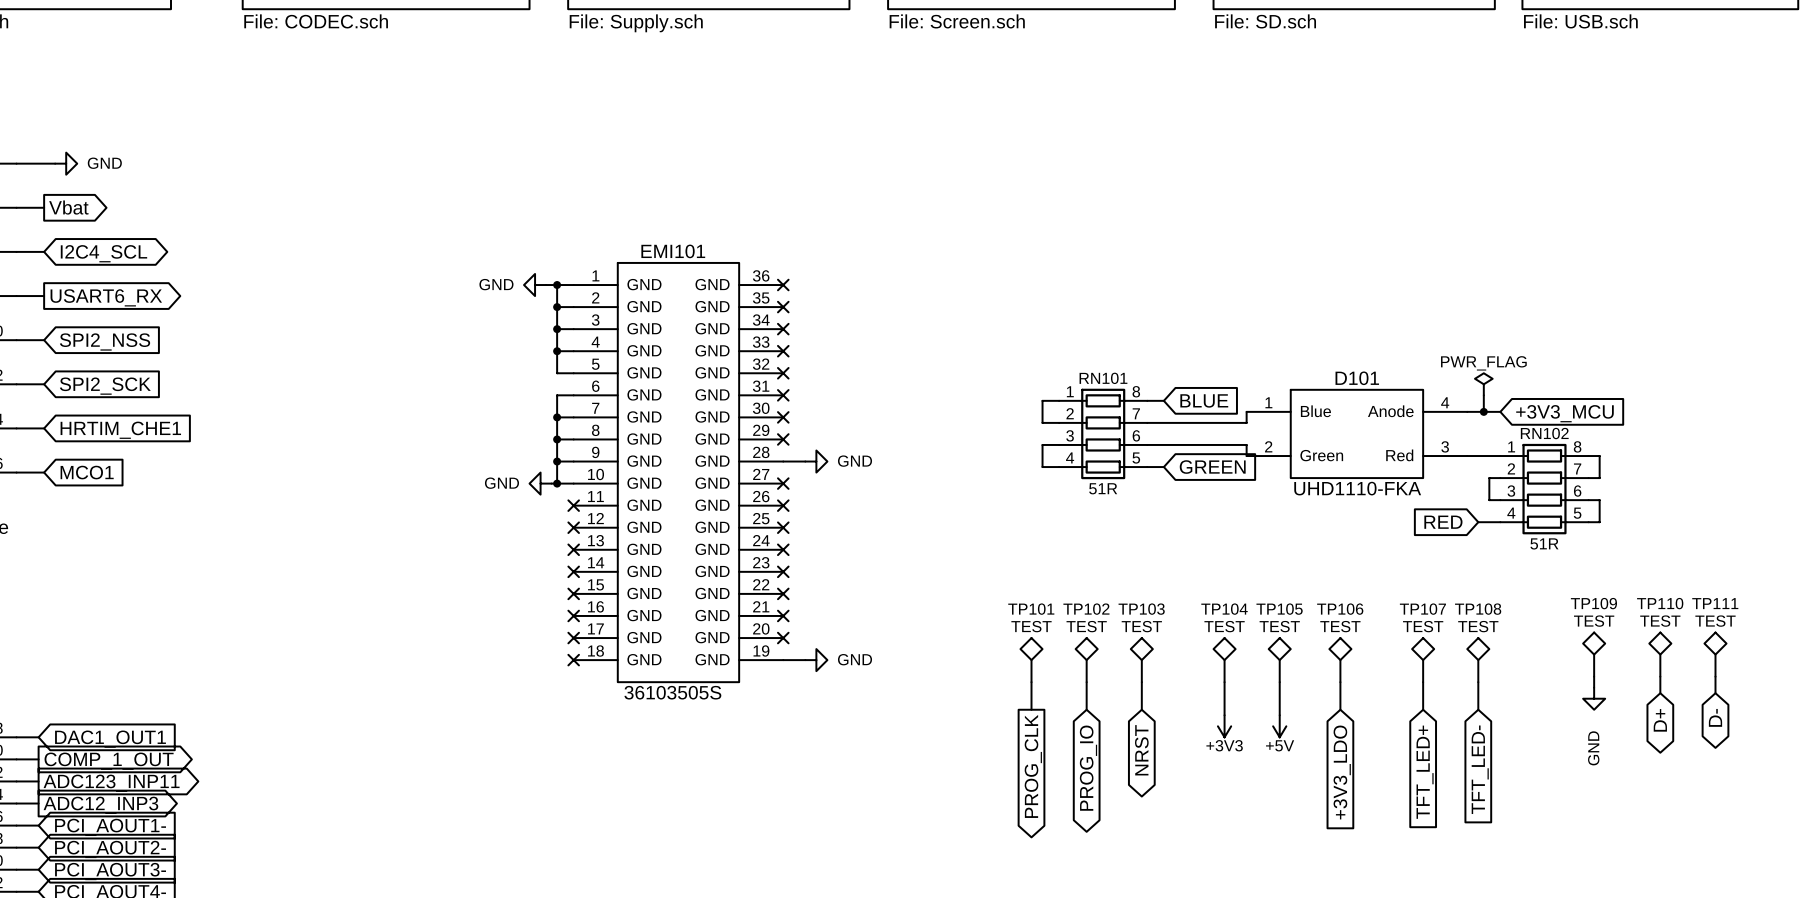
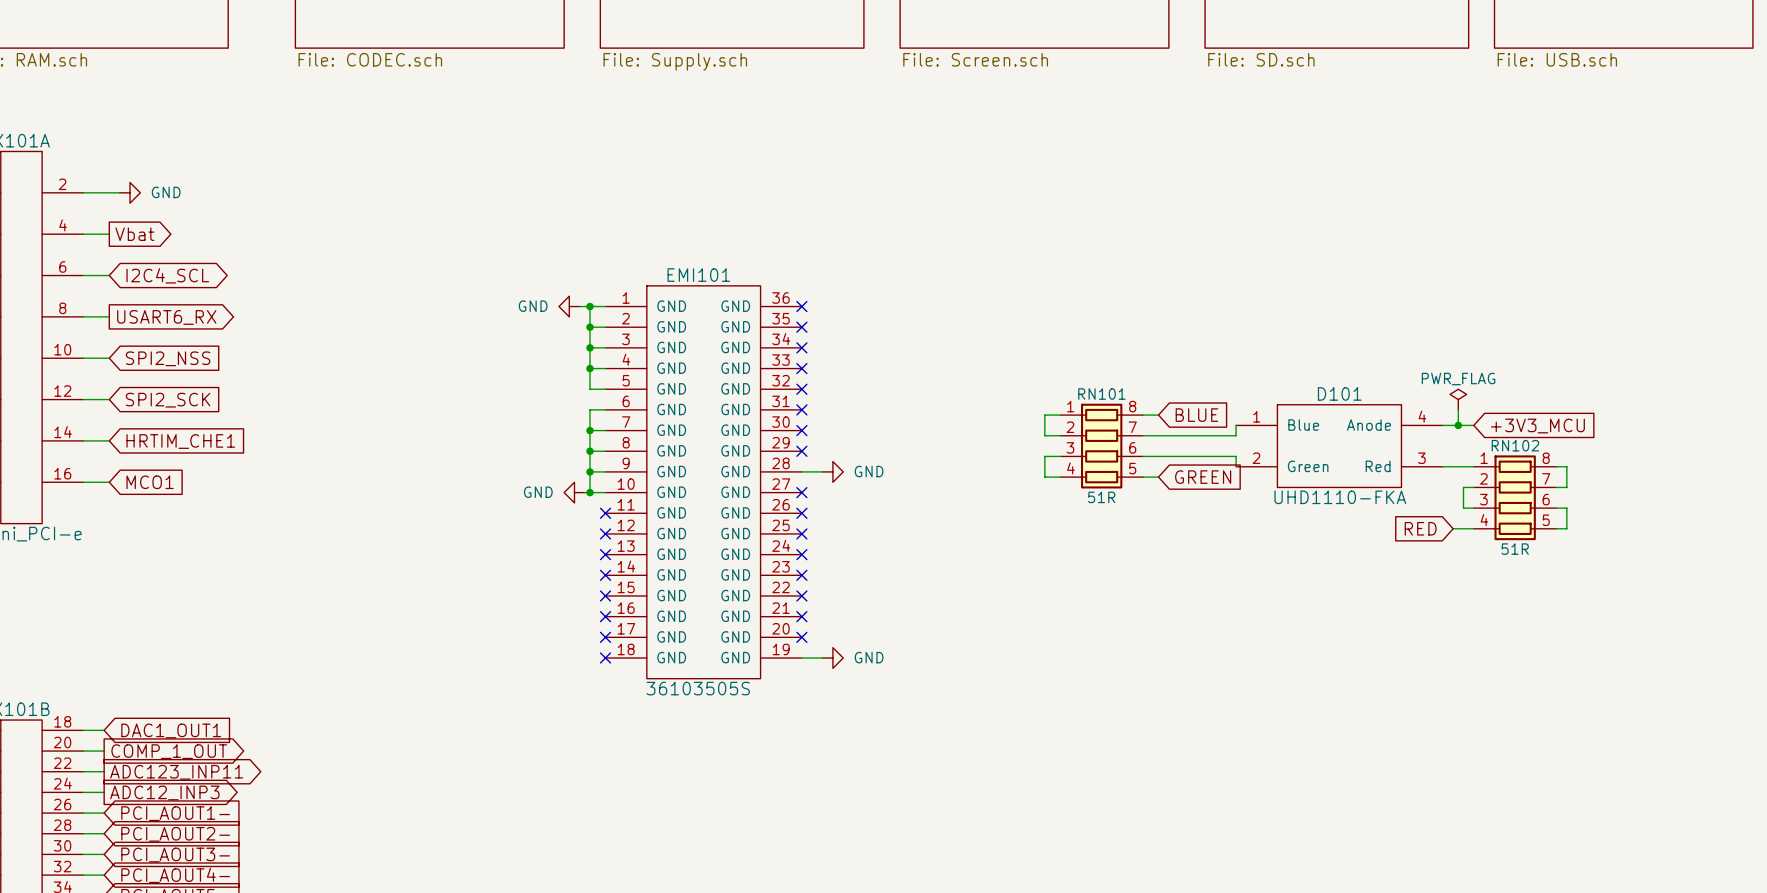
TP109: TEST (1594, 654) -> none
TP110: TEST (1660, 654) -> none
TP111: TEST (1715, 654) -> none
TP101: TEST (1031, 660) -> none
TP102: TEST (1086, 660) -> none
TP103: TEST (1141, 660) -> none
TP104: TEST (1224, 660) -> none
TP105: TEST (1279, 660) -> none
TP106: TEST (1340, 660) -> none
TP107: TEST (1423, 660) -> none
TP108: TEST (1478, 660) -> none
wire: (1594, 676) (1594, 687) -> none
wire: (1660, 676) (1660, 693) -> none
wire: (1715, 676) (1715, 693) -> none
wire: (1031, 682) (1031, 709) -> none
wire: (1086, 682) (1086, 709) -> none
wire: (1141, 682) (1141, 709) -> none
wire: (1224, 682) (1224, 715) -> none
wire: (1279, 682) (1279, 715) -> none
wire: (1340, 682) (1340, 709) -> none
wire: (1423, 682) (1423, 709) -> none
wire: (1478, 682) (1478, 709) -> none
power symbol: GND (1594, 698) -> none
global label: D- (1715, 717) -> none
global label: D+ (1660, 720) -> none
power symbol: +3V3 (1224, 726) -> none
power symbol: +5V (1279, 726) -> none
global label: NRST (1141, 750) -> none
global label: PROG_CLK (1033, 766) -> none
global label: PROG_IO (1088, 768) -> none
global label: TFT_LED- (1480, 769) -> none
global label: +3V3_LDO (1342, 772) -> none
global label: TFT_LED+ (1425, 772) -> none

